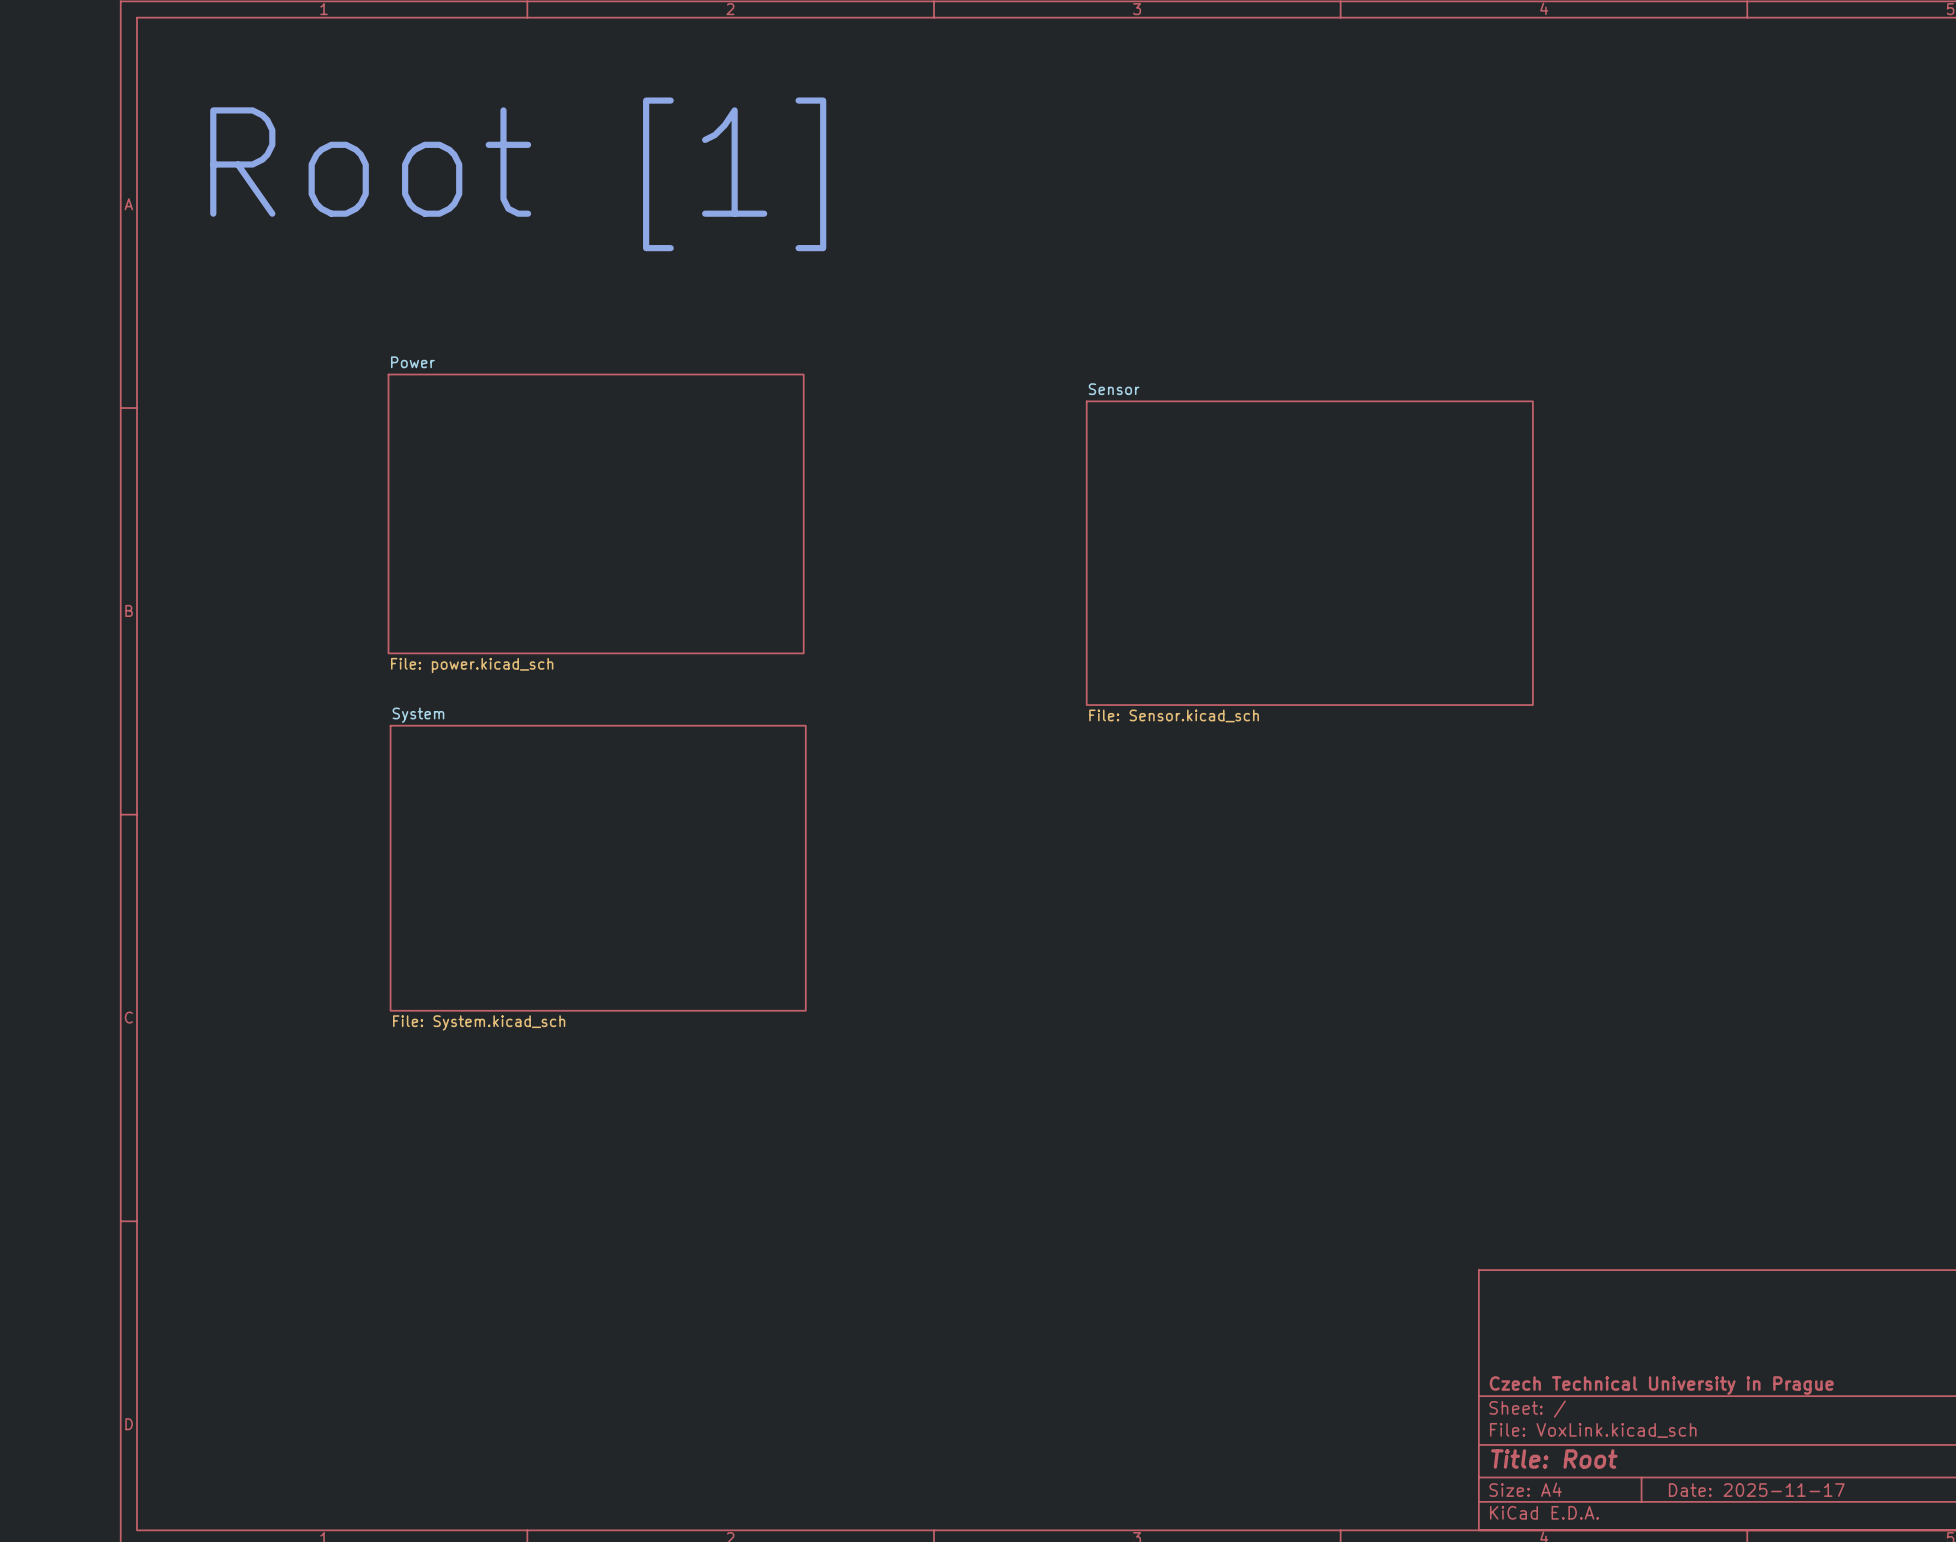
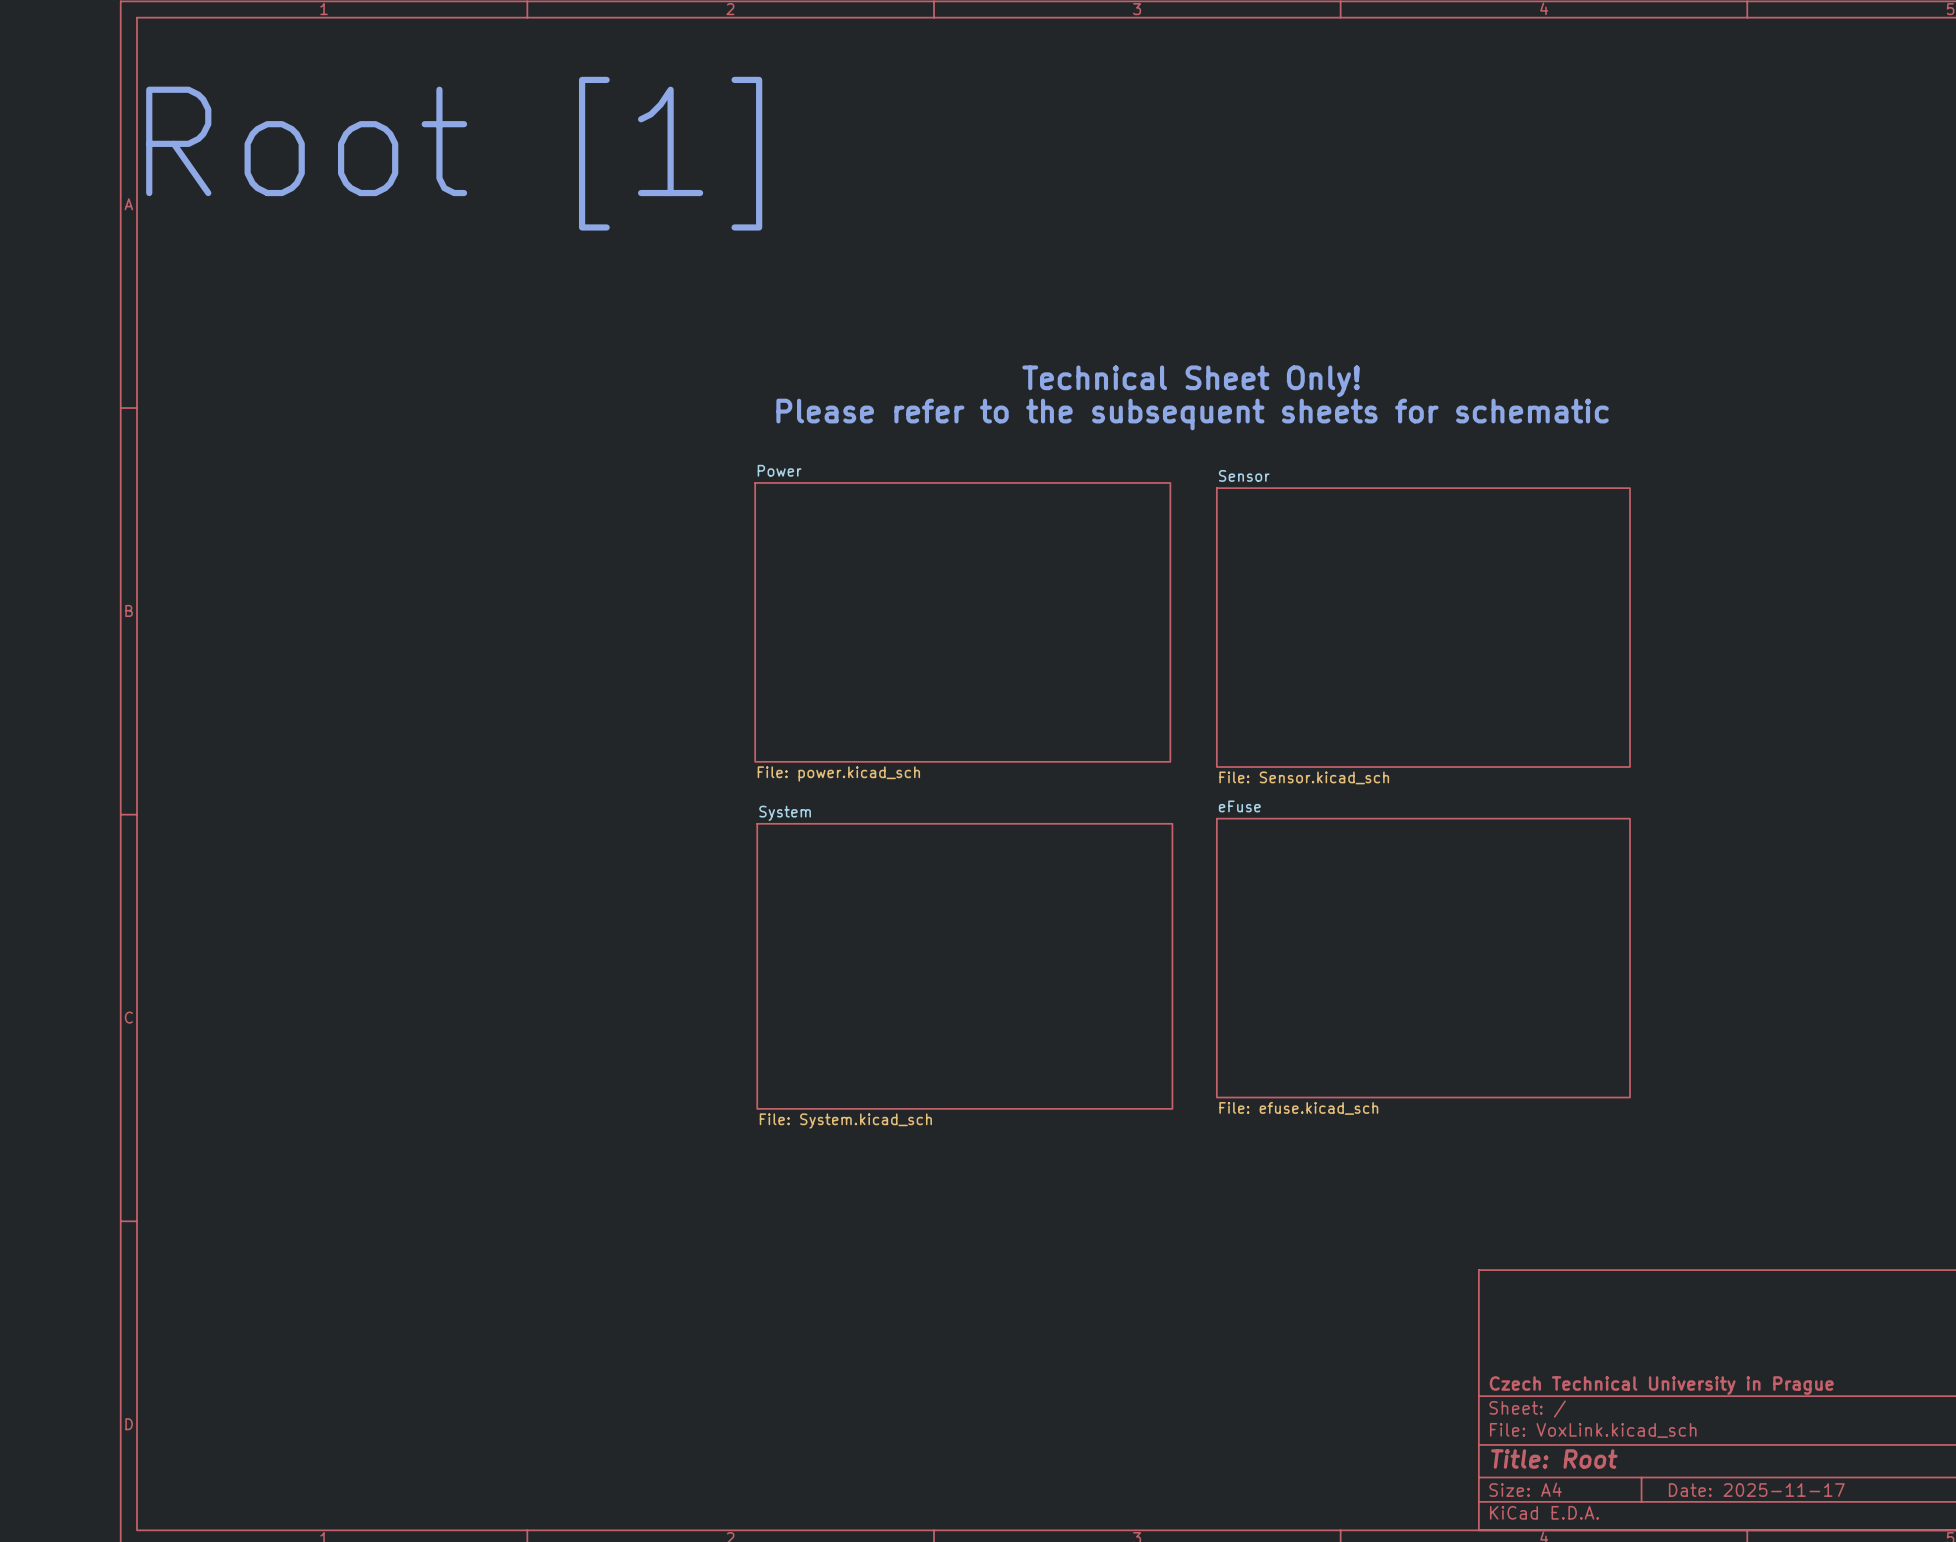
text position: Root [1] (518, 174) -> Root [1] (454, 153)
text: none -> Technical Sheet Only! (1191, 381)
text: none -> Please refer to the subsequent sheets for schematic (1192, 414)
sheet Power: File: power.kicad_sch (596, 513) -> none
sheet Sensor: File: Sensor.kicad_sch (1309, 553) -> none
sheet Power: none -> File: power.kicad_sch (962, 622)
sheet Sensor: none -> File: Sensor.kicad_sch (1423, 627)
sheet System: File: System.kicad_sch (598, 868) -> none
sheet eFuse: none -> File: efuse.kicad_sch (1423, 958)
sheet System: none -> File: System.kicad_sch (964, 966)

